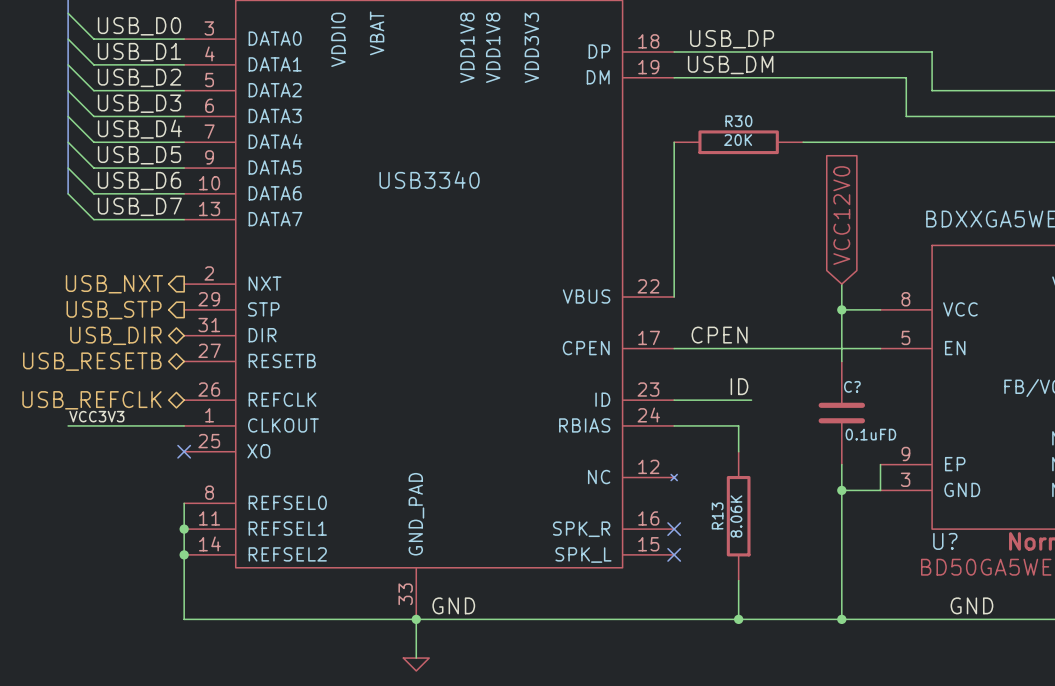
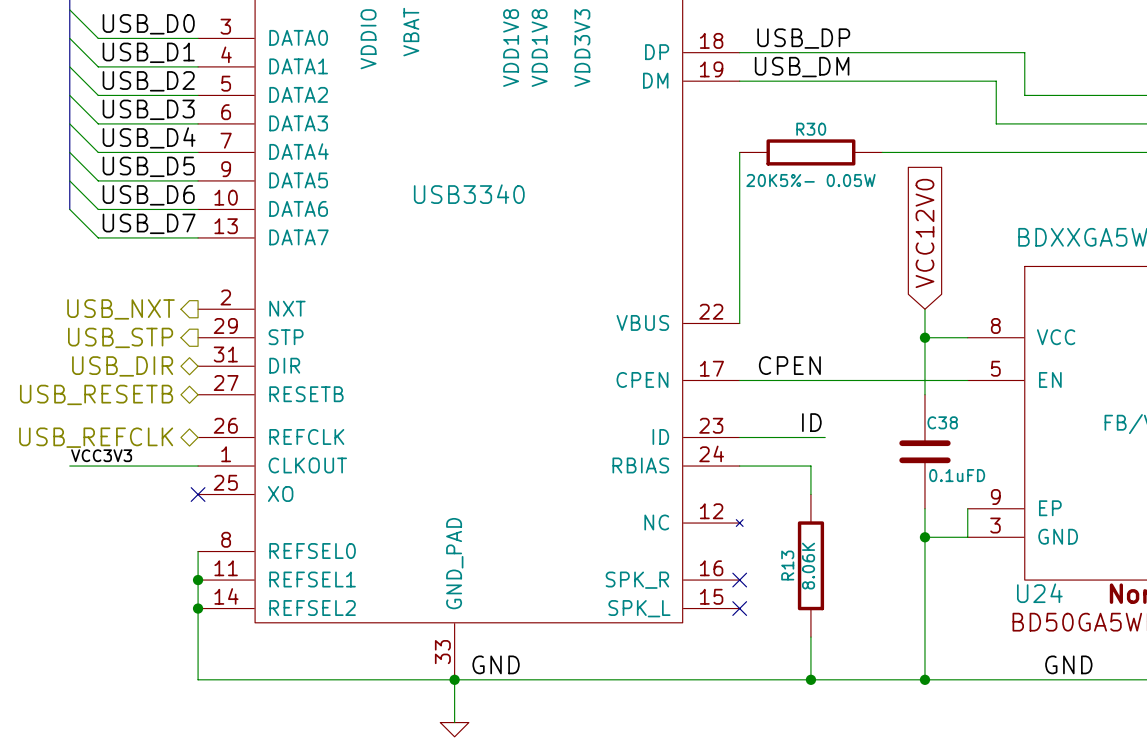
R30 value: 20K (738, 140) -> 20K5%- 0.05W (810, 180)
C? name: C? (852, 386) -> C38 (942, 422)
U? name: U? (945, 541) -> U24 (1039, 593)

